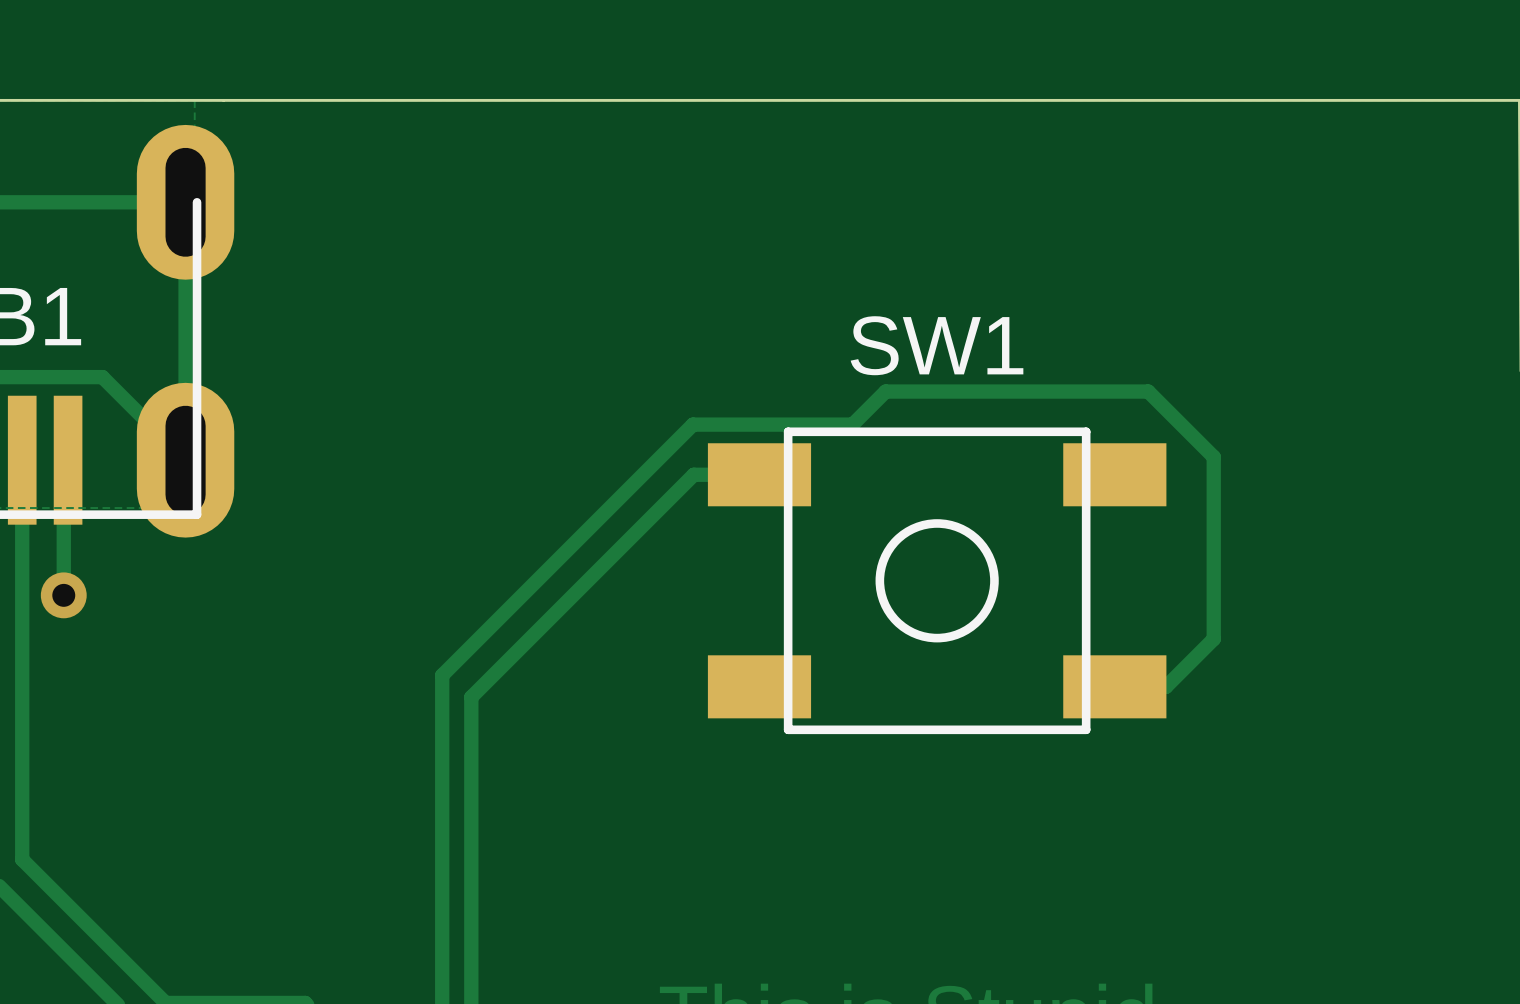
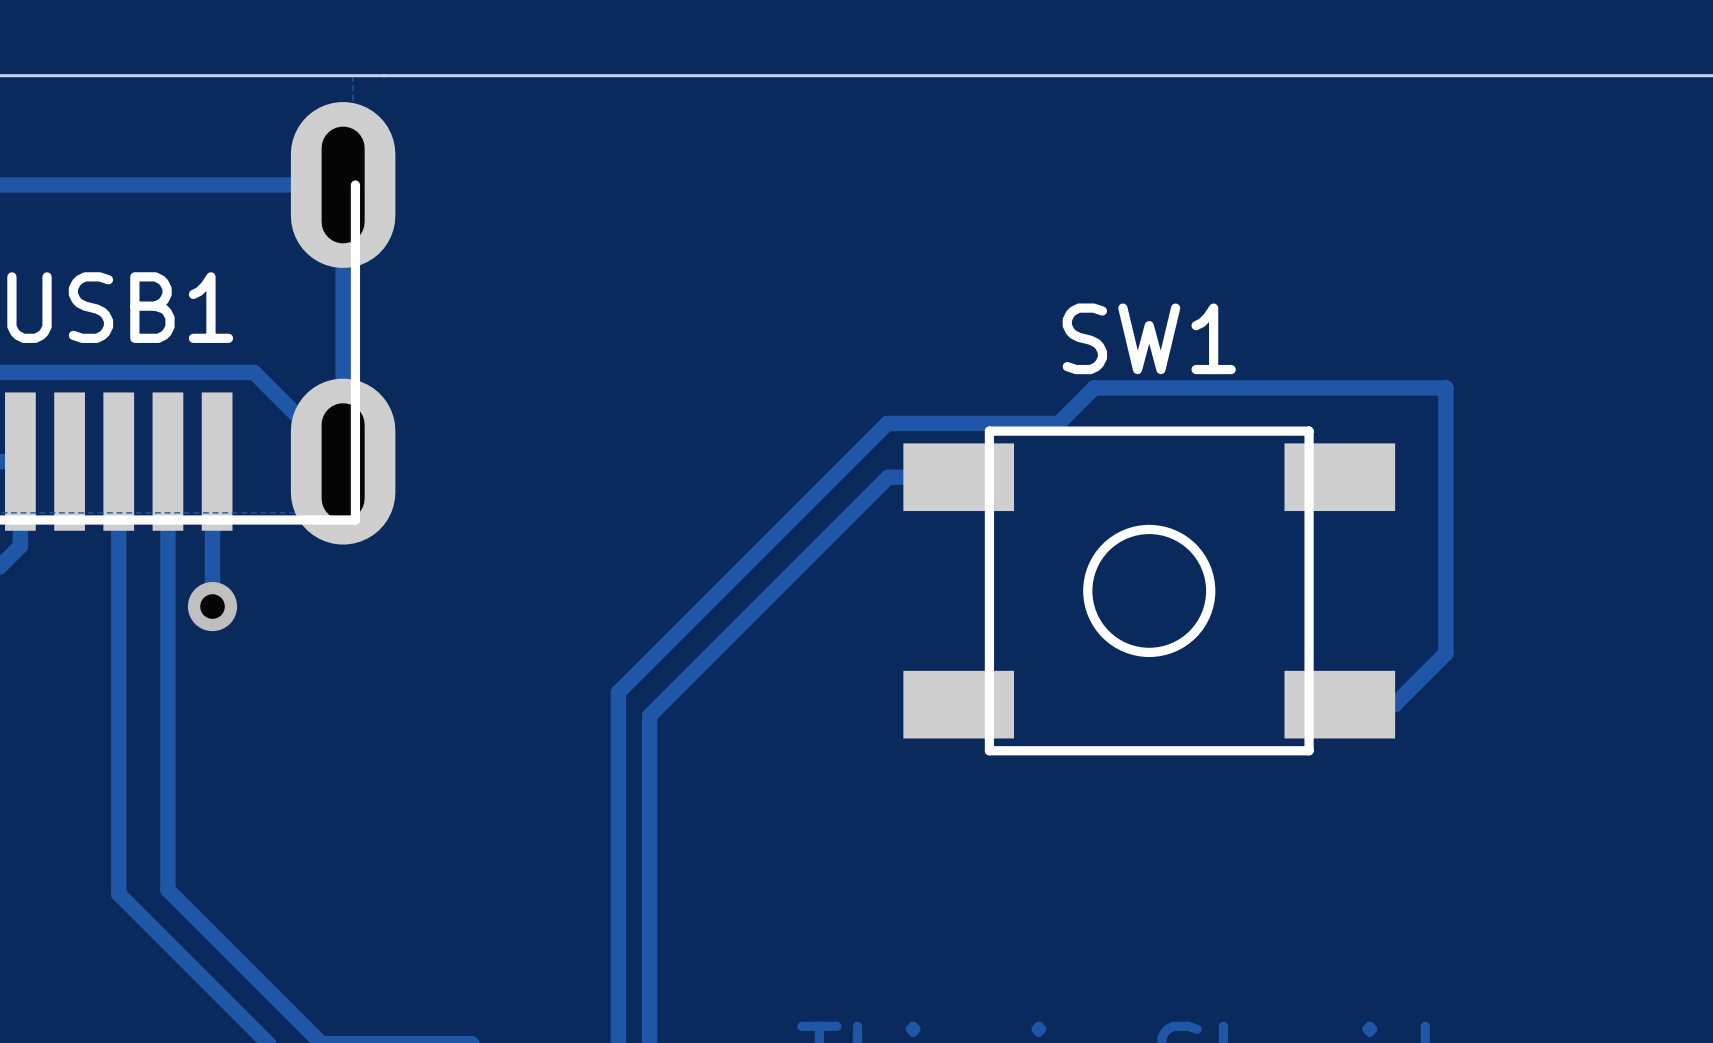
track: (1148, 391) (1213, 457) -> (1375, 387) (1445, 387) (1445, 458)

